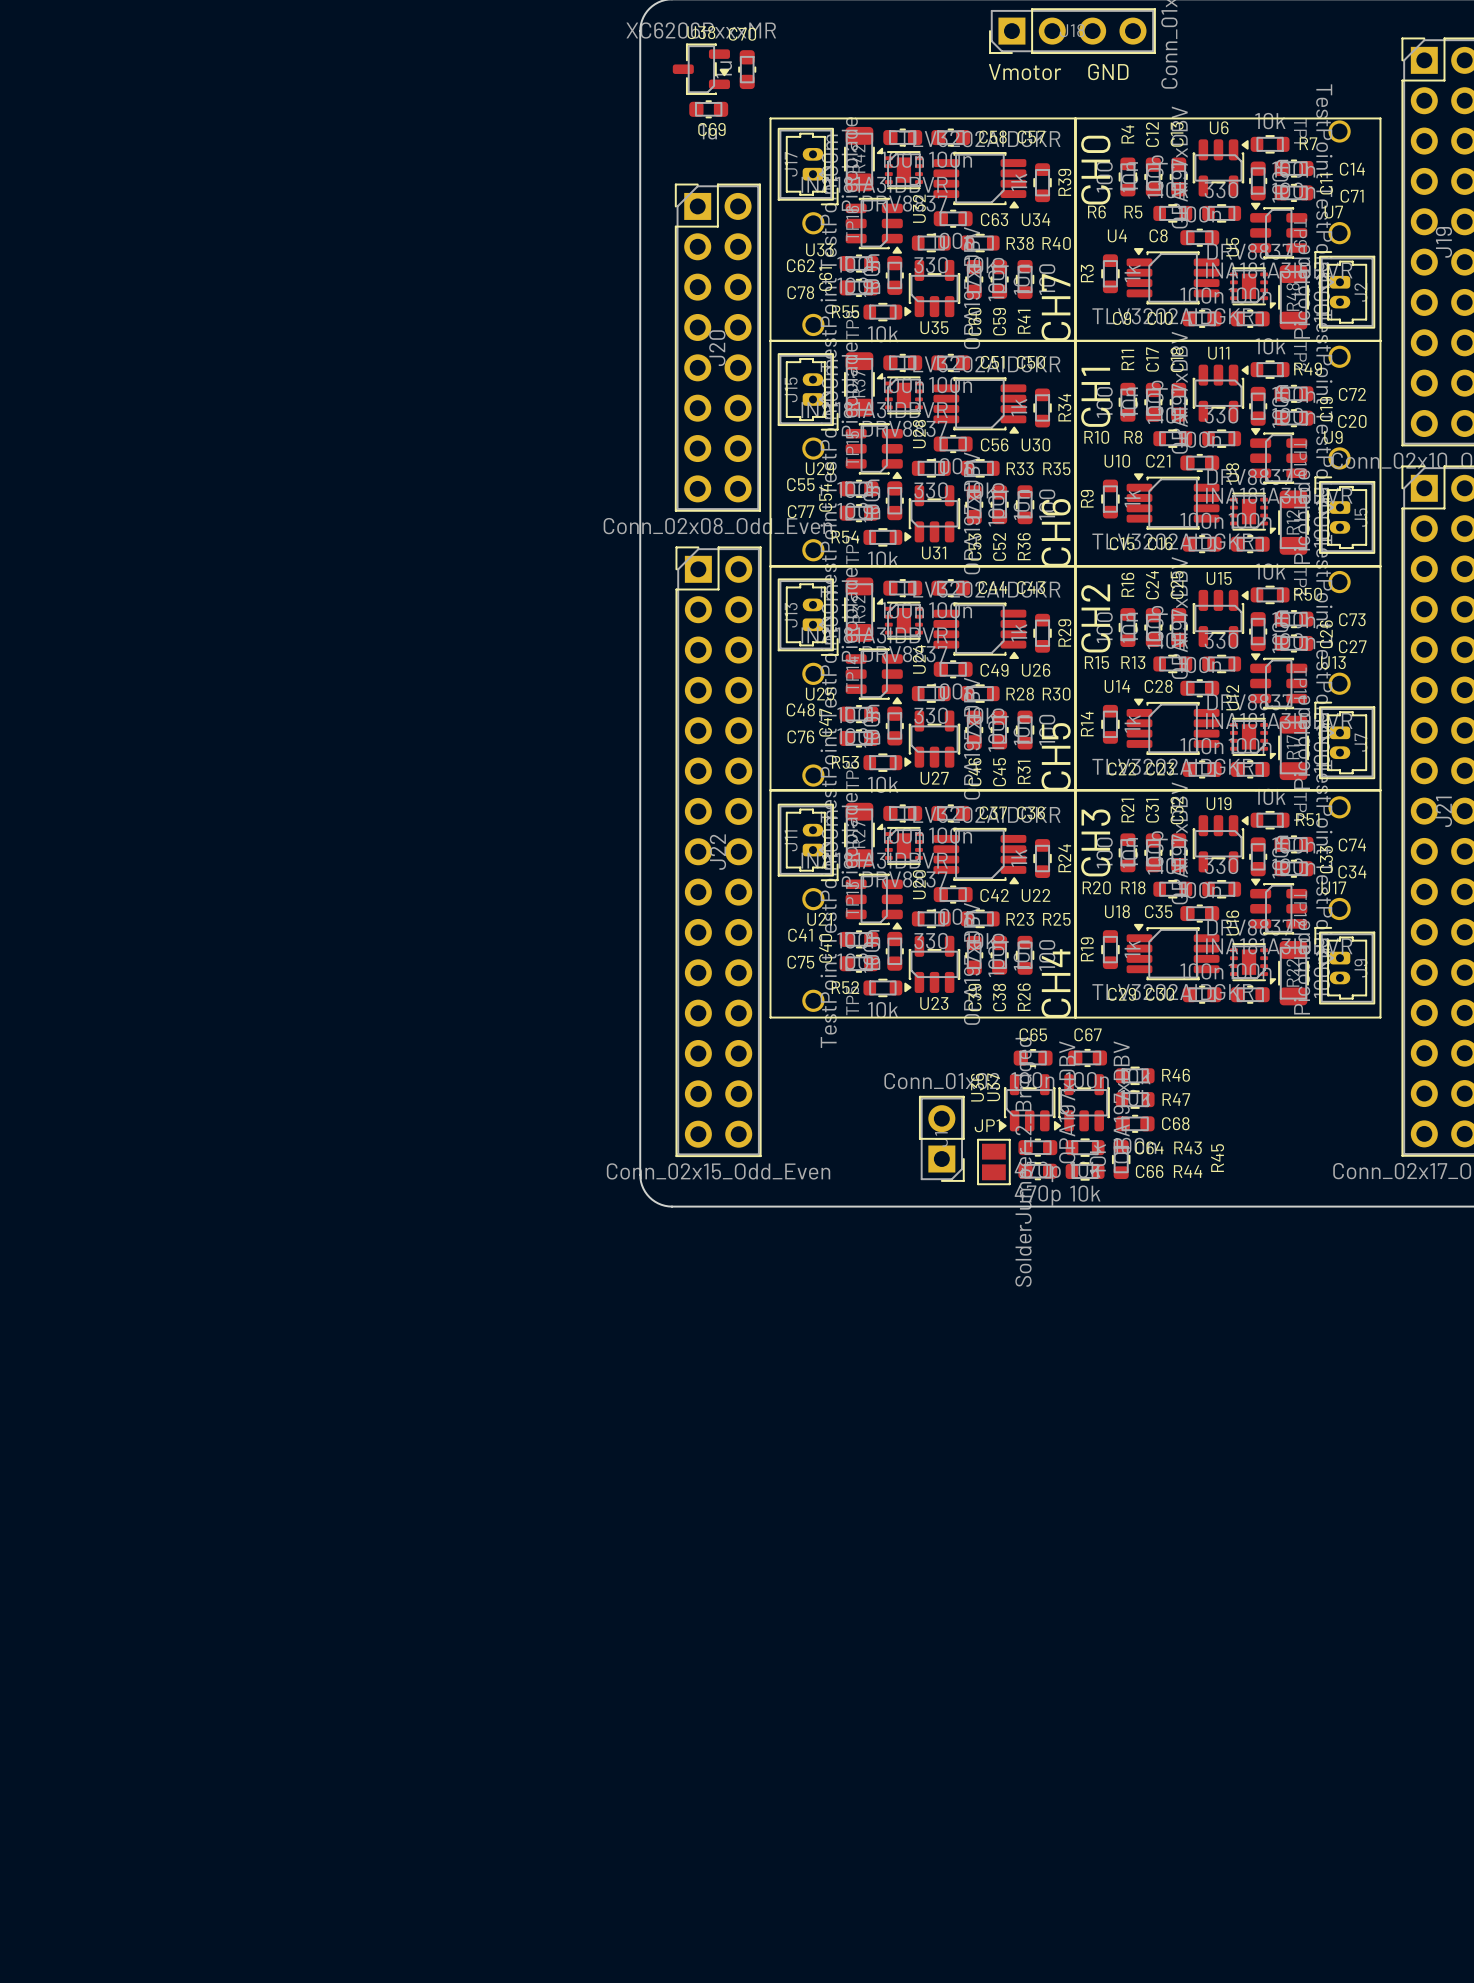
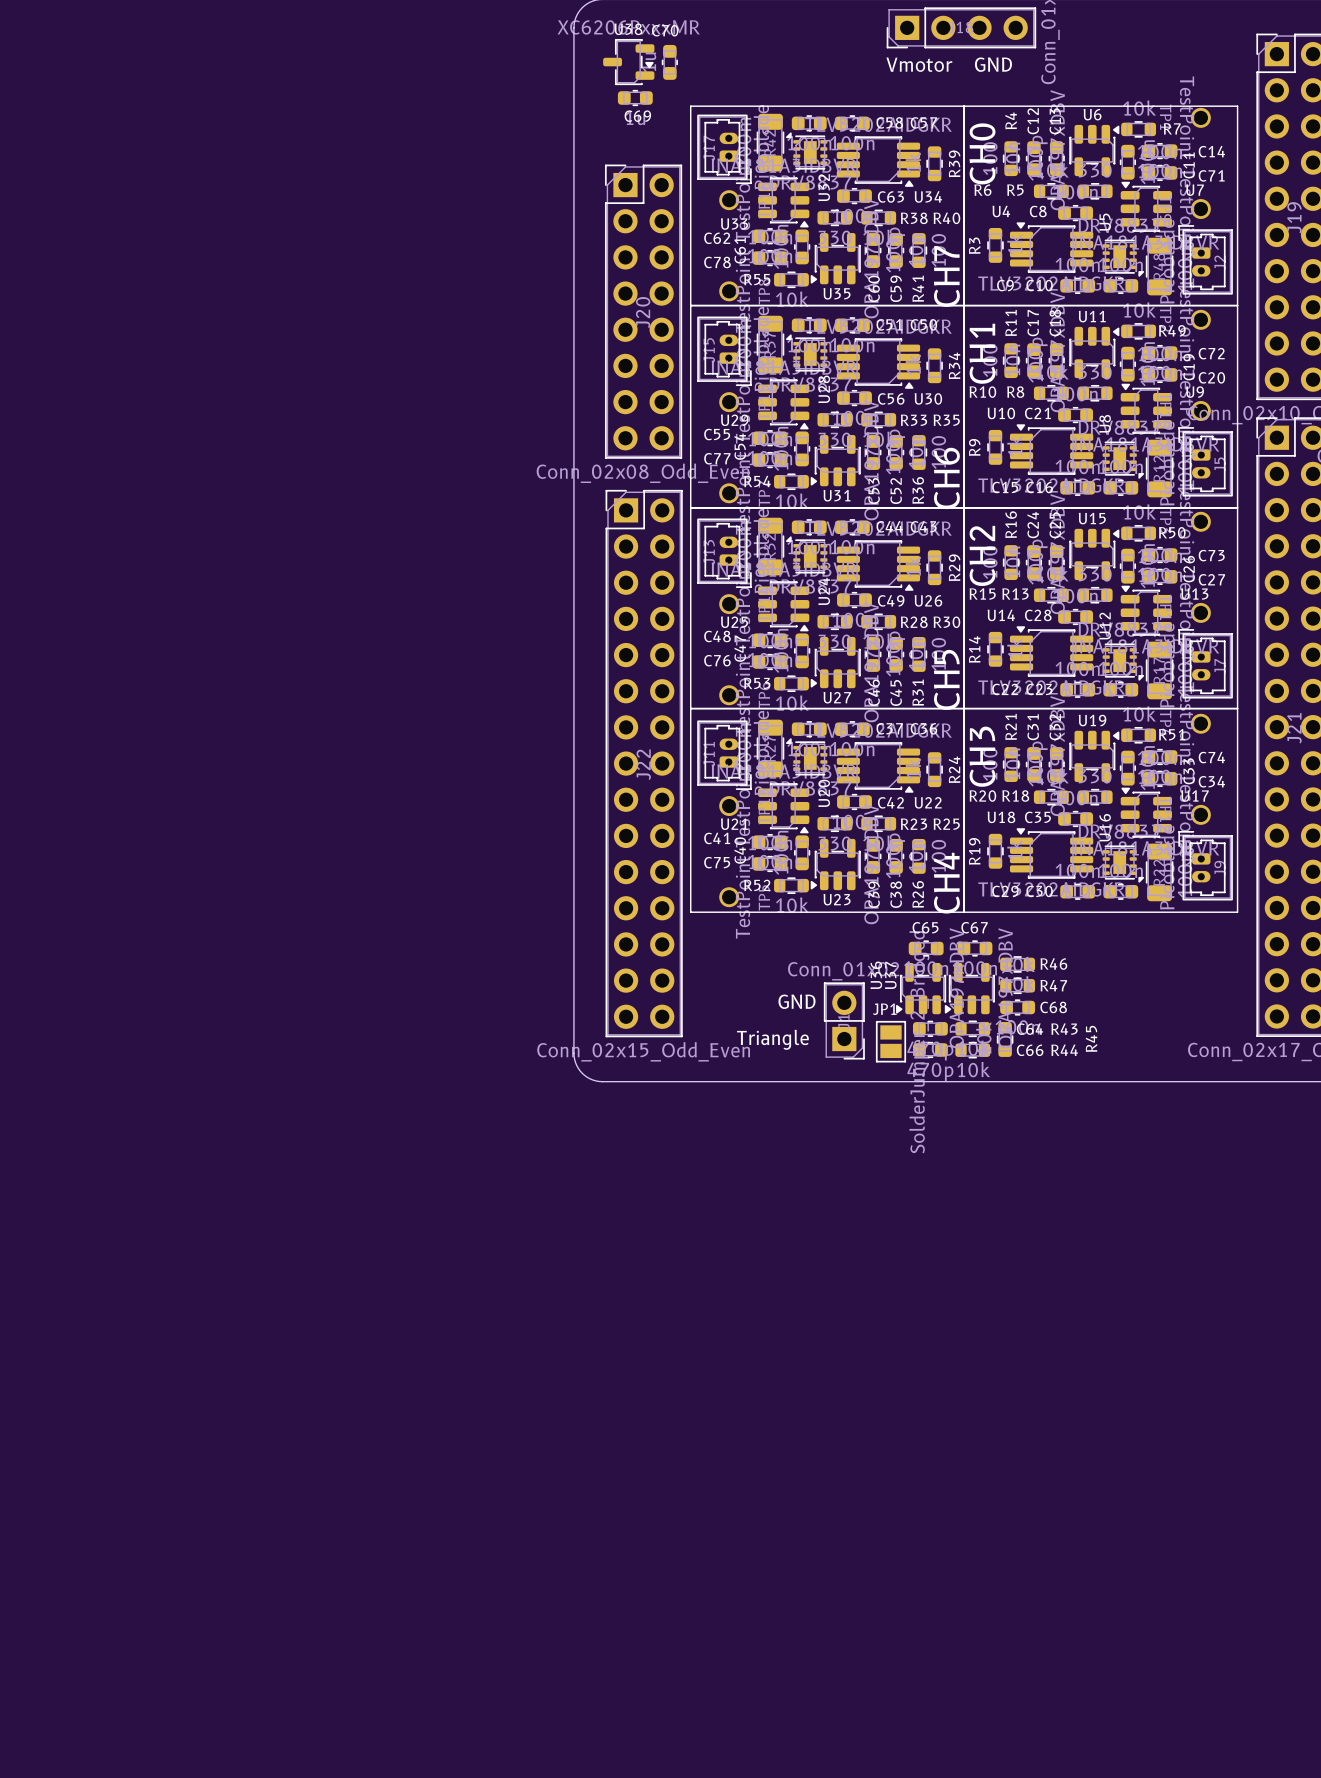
text: none -> GND (796, 1001)
text: none -> Triangle (772, 1039)

